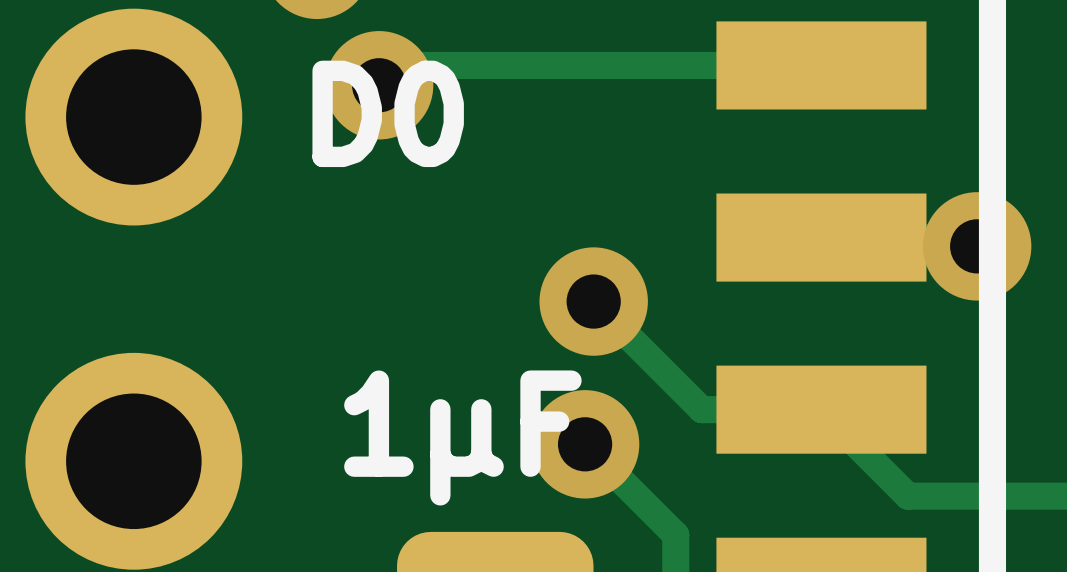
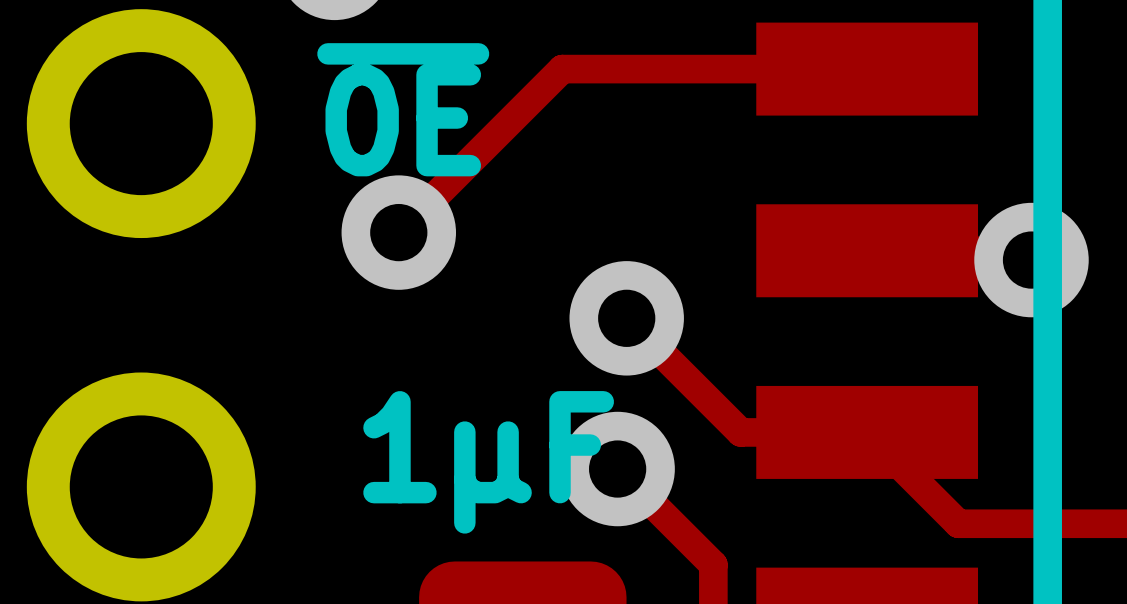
track: (532, 65) (398, 65) (379, 85) -> (562, 69) (398, 232)
via position: (379, 85) -> (398, 232)
text: D0 (388, 113) -> ~{0E} (403, 109)

